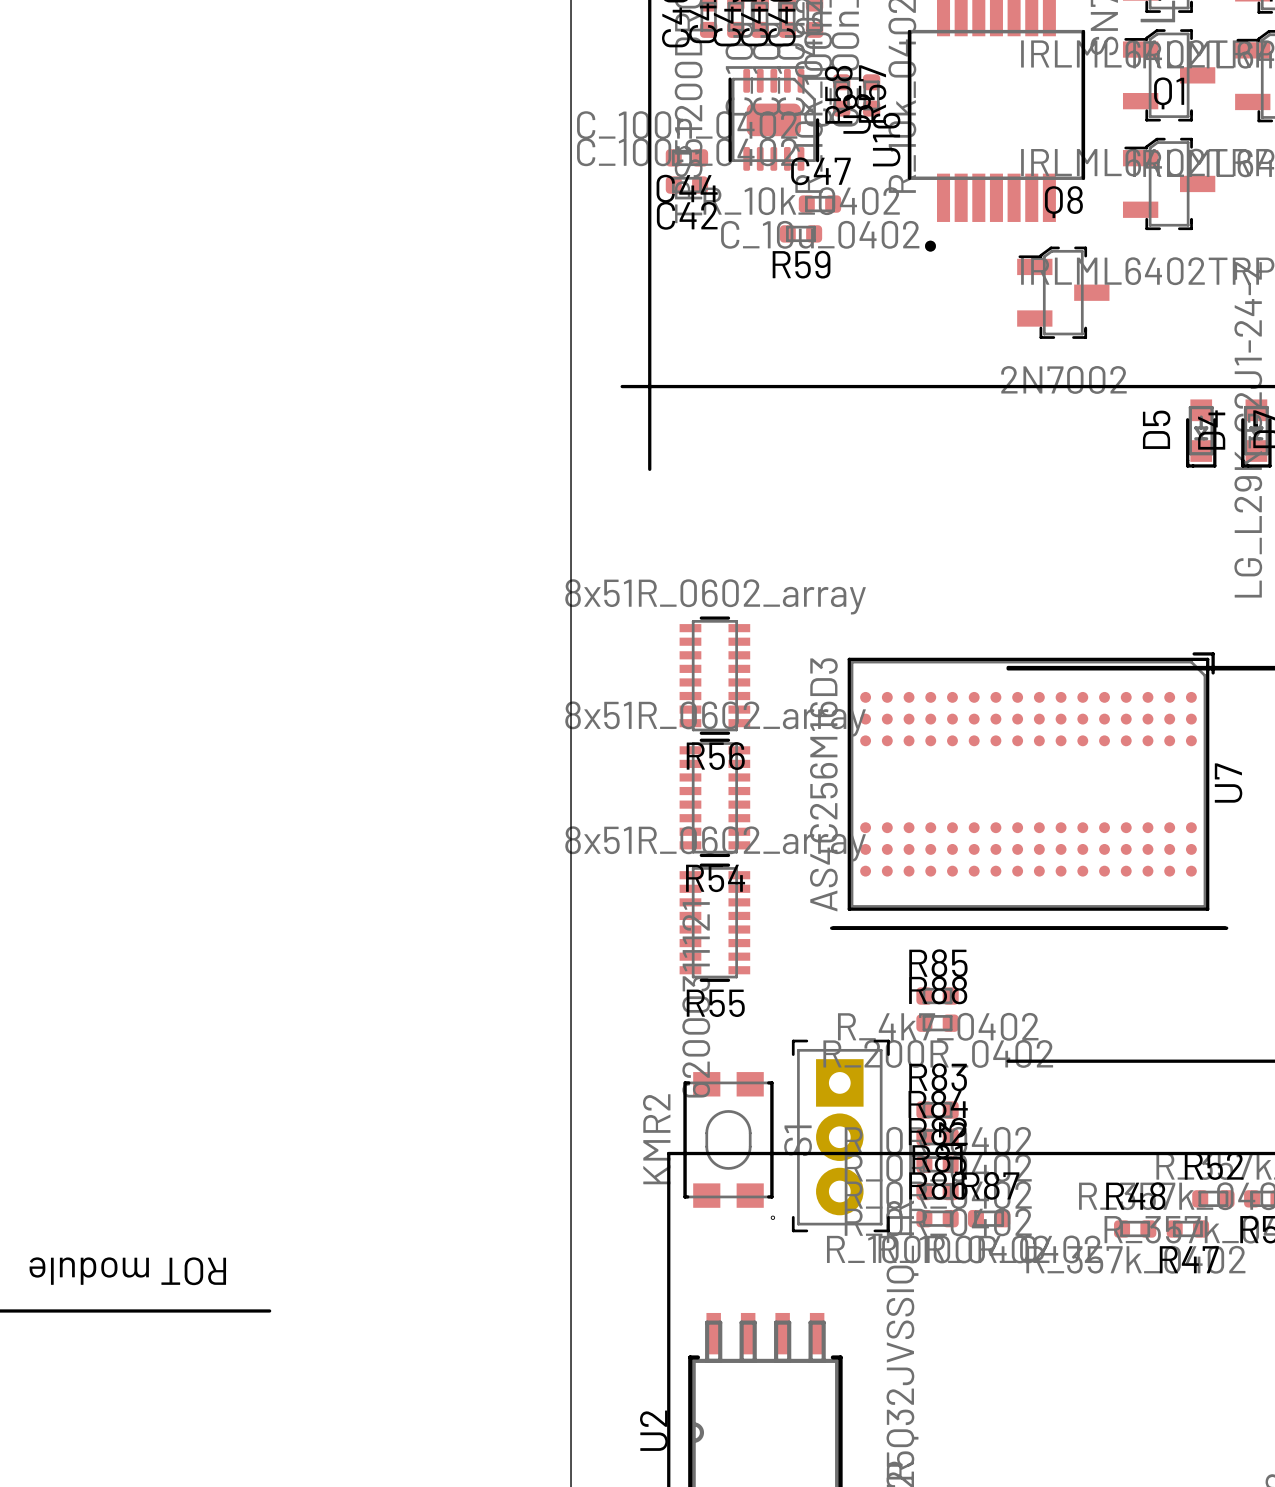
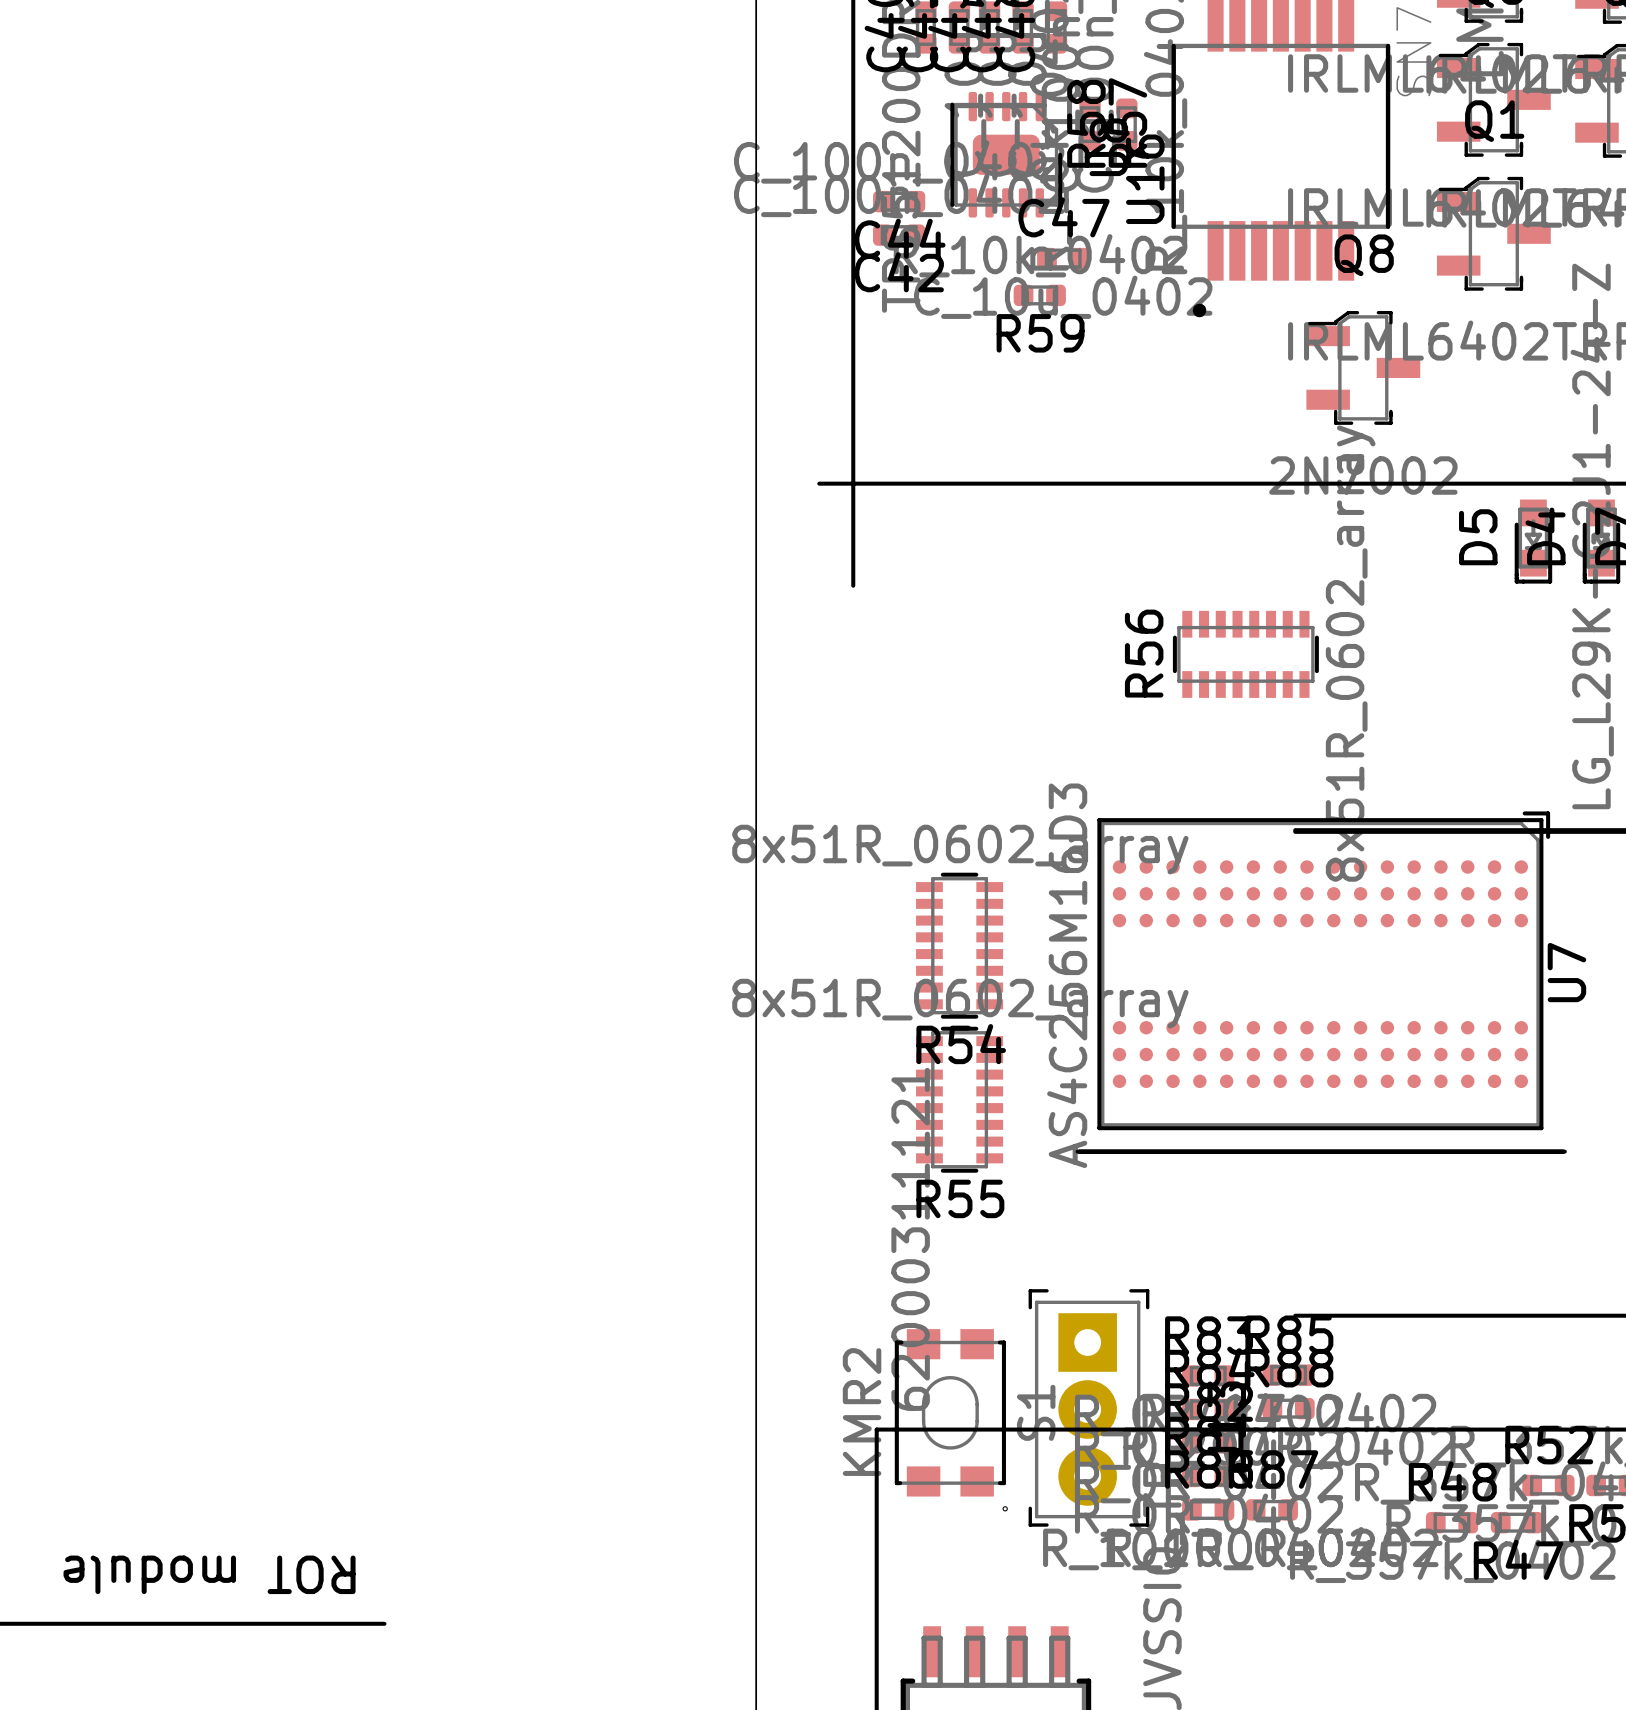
R56 rotation: 0° (714, 675) -> 90° clockwise (1245, 654)
R56 position: (714, 675) -> (1245, 654)
R54 position: (714, 797) -> (959, 945)
R55 position: (714, 922) -> (959, 1099)
R85 position: (937, 996) -> (1288, 1375)
R88 position: (937, 1023) -> (1288, 1408)

